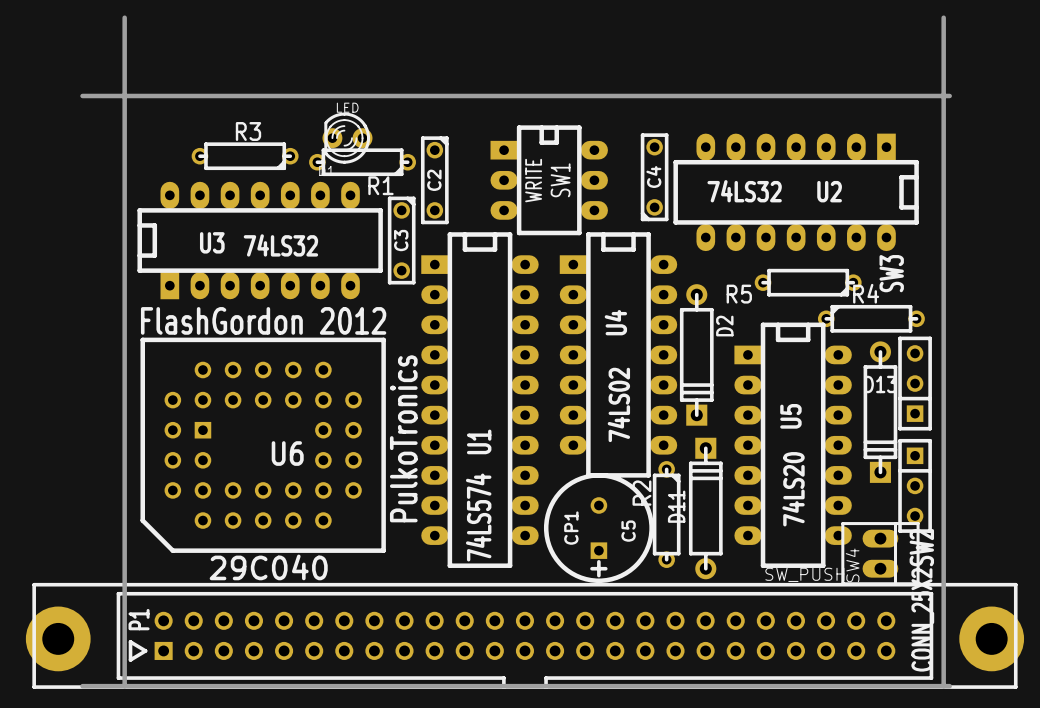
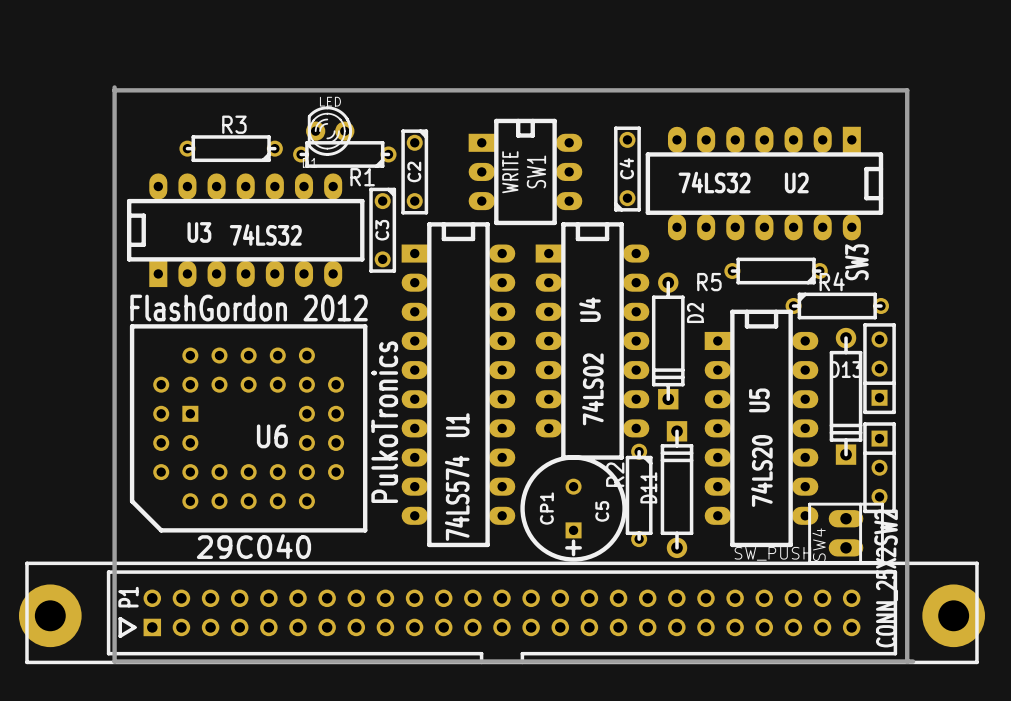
board edge: (124, 17) (124, 92) -> none
board edge: (943, 17) (943, 95) (949, 95) -> none
board edge: (82, 95) (124, 95) -> none
board edge: (82, 686) (124, 686) -> none

